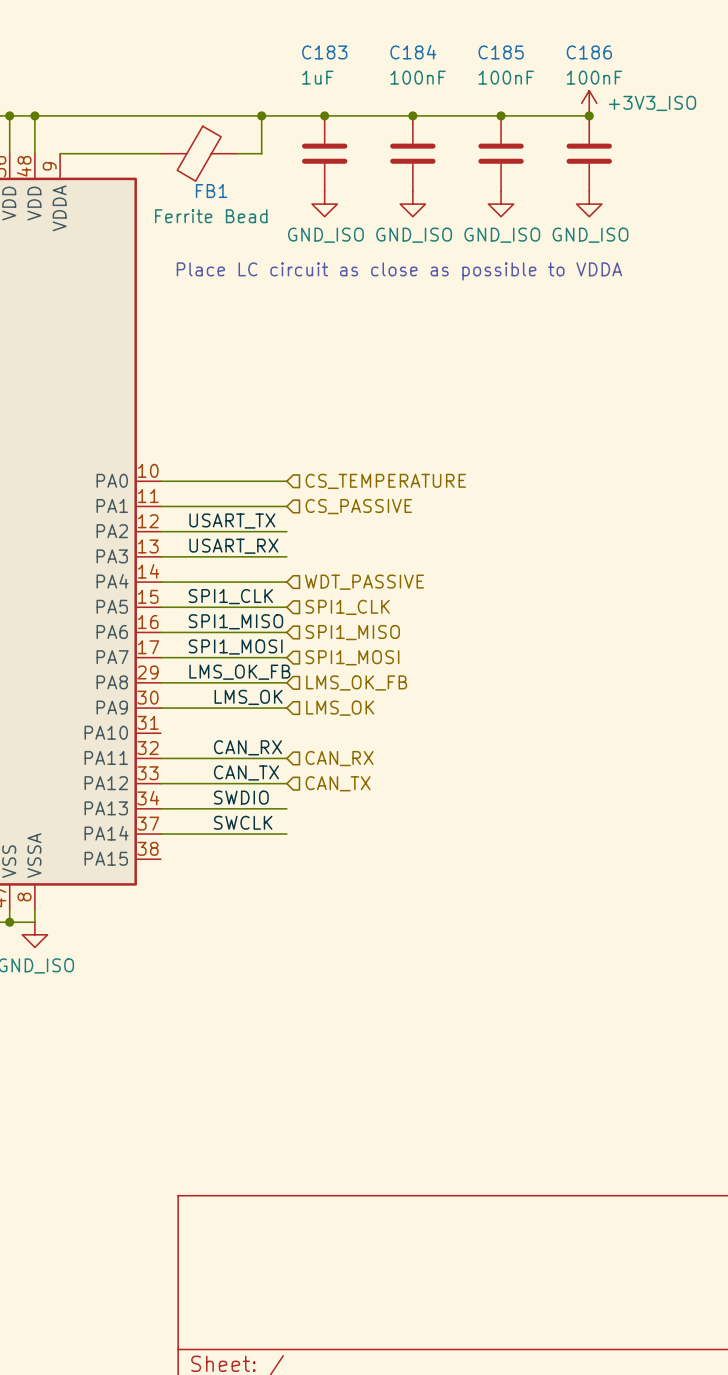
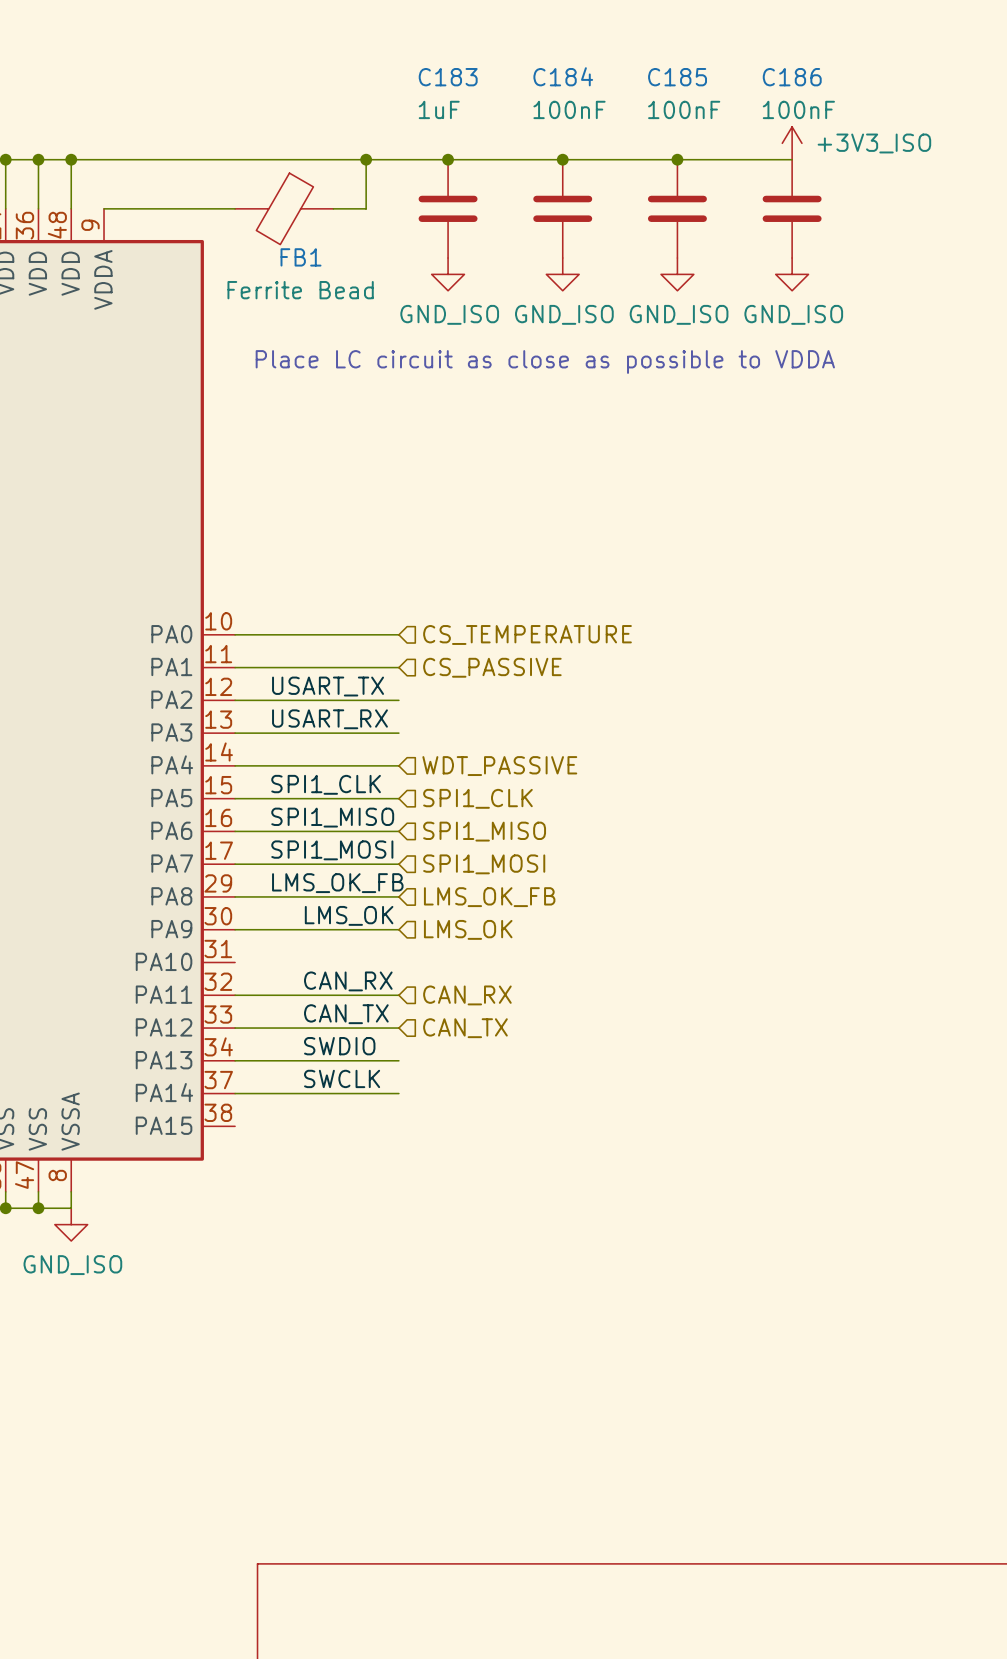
junction: (589, 115) -> none

